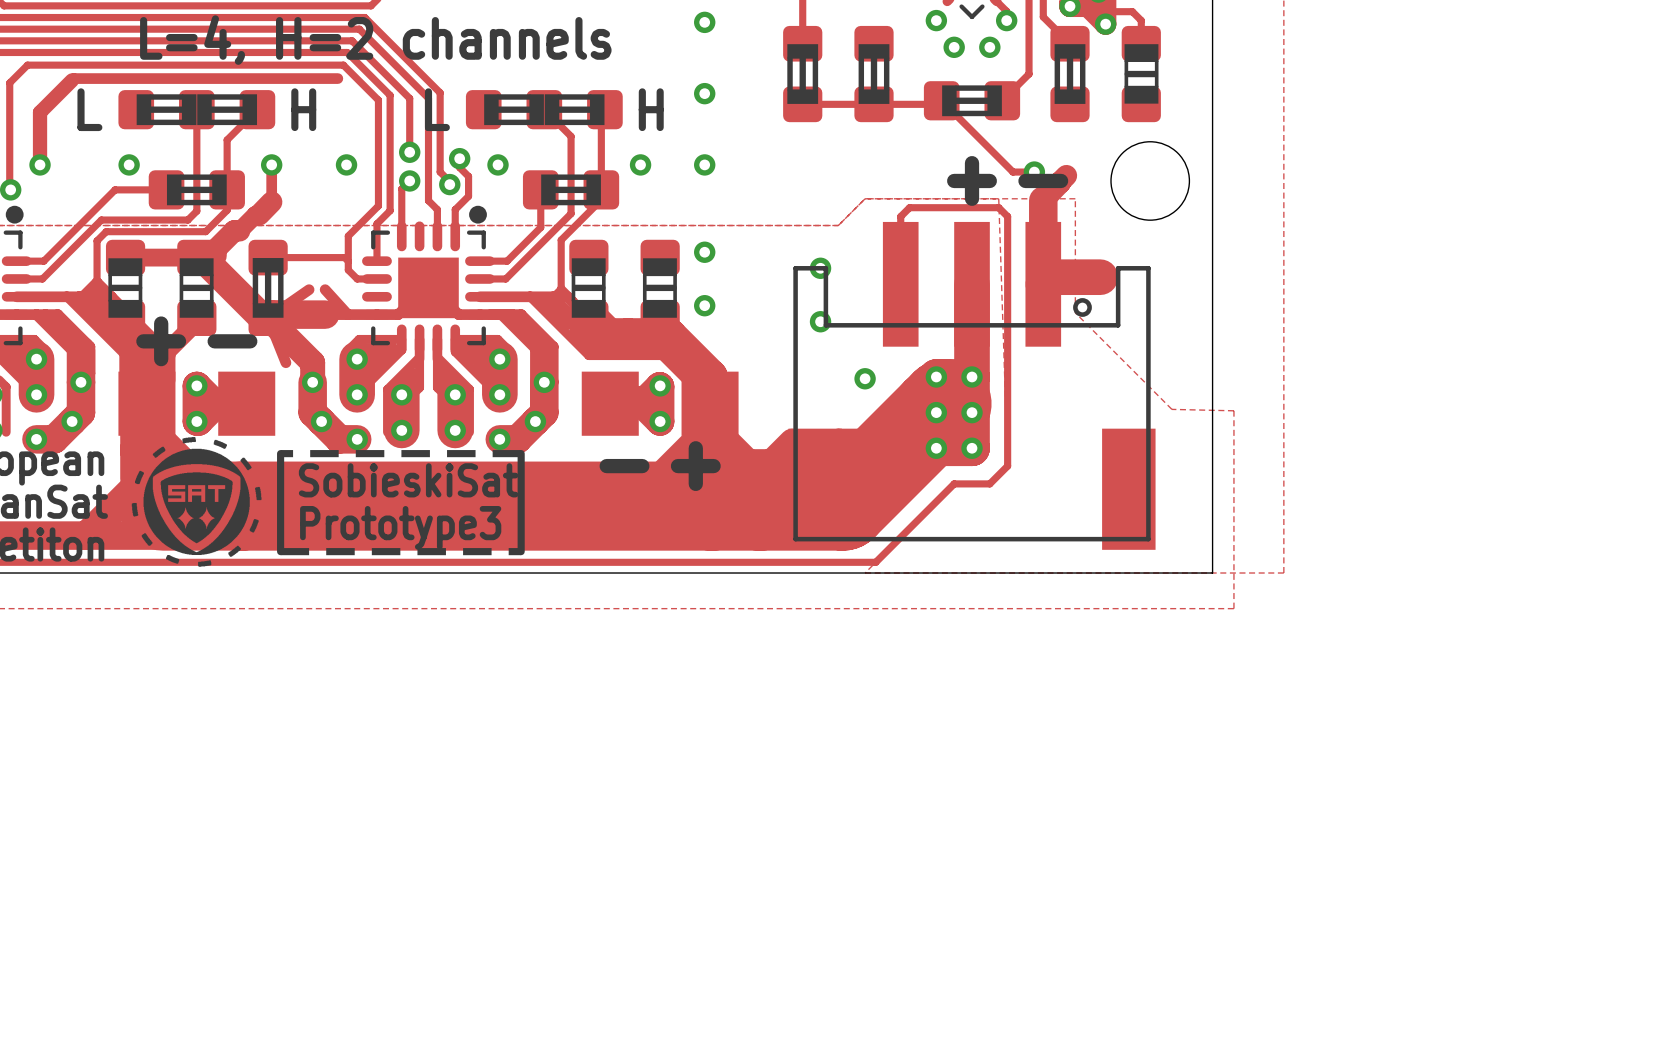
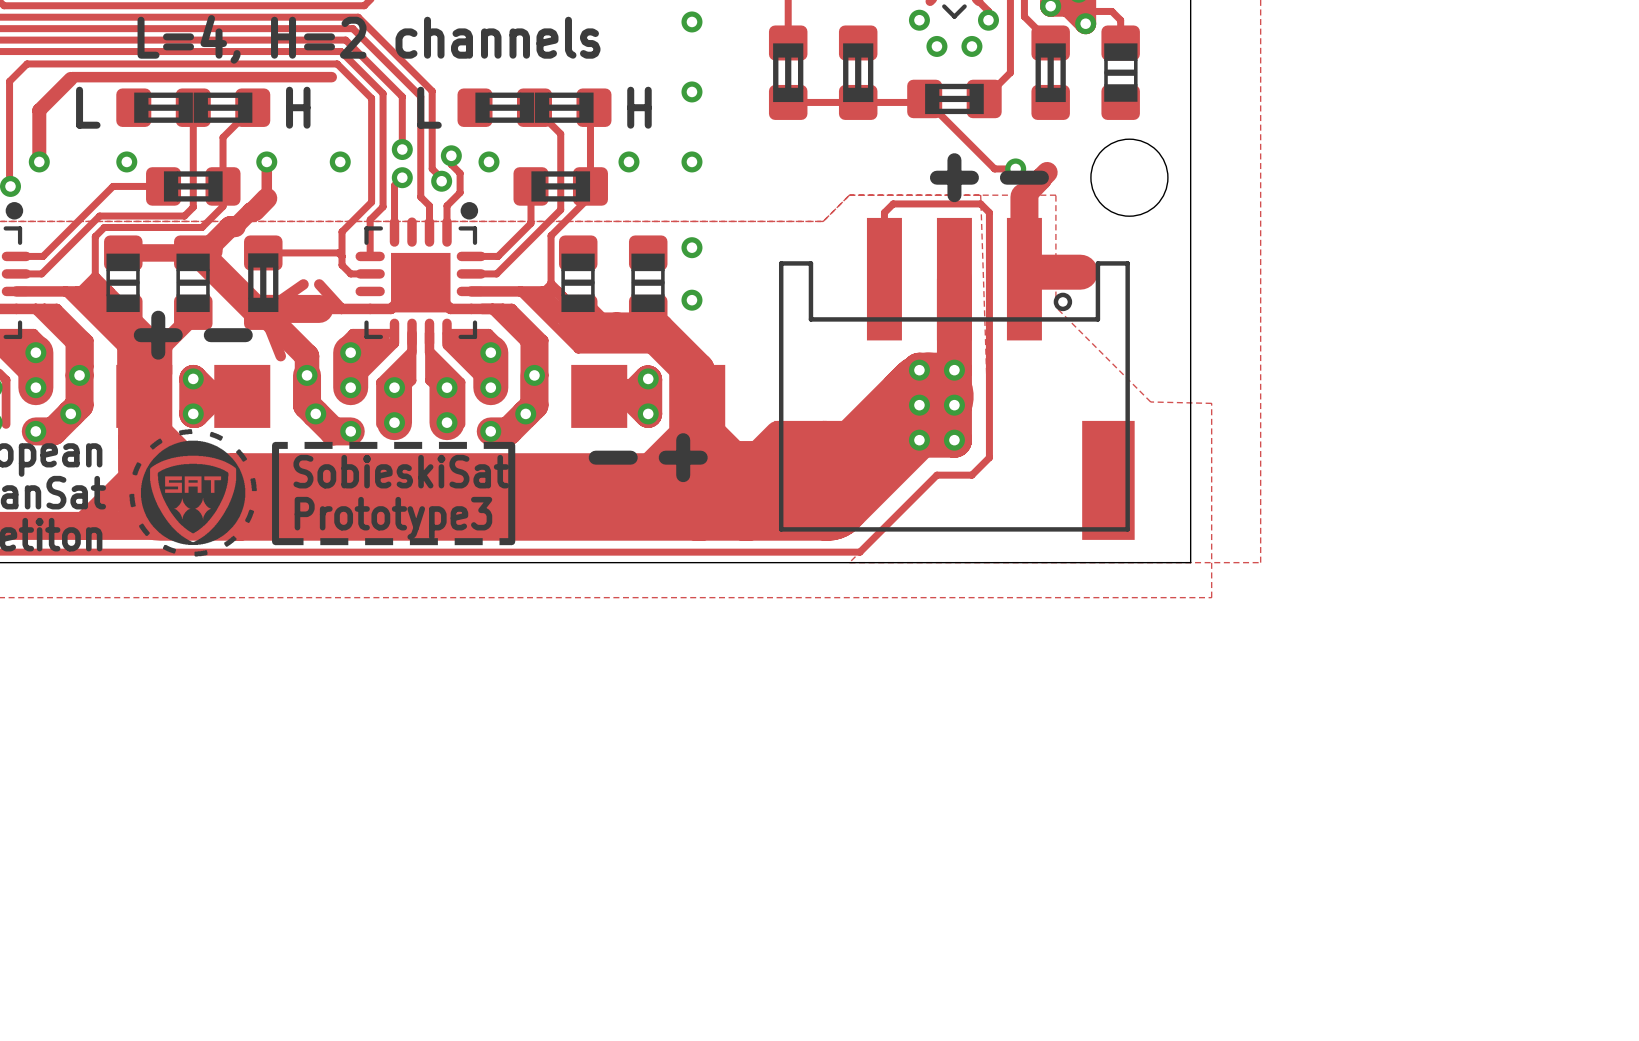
via: (820, 268) -> none
via: (820, 321) -> none
via: (865, 378) -> none

